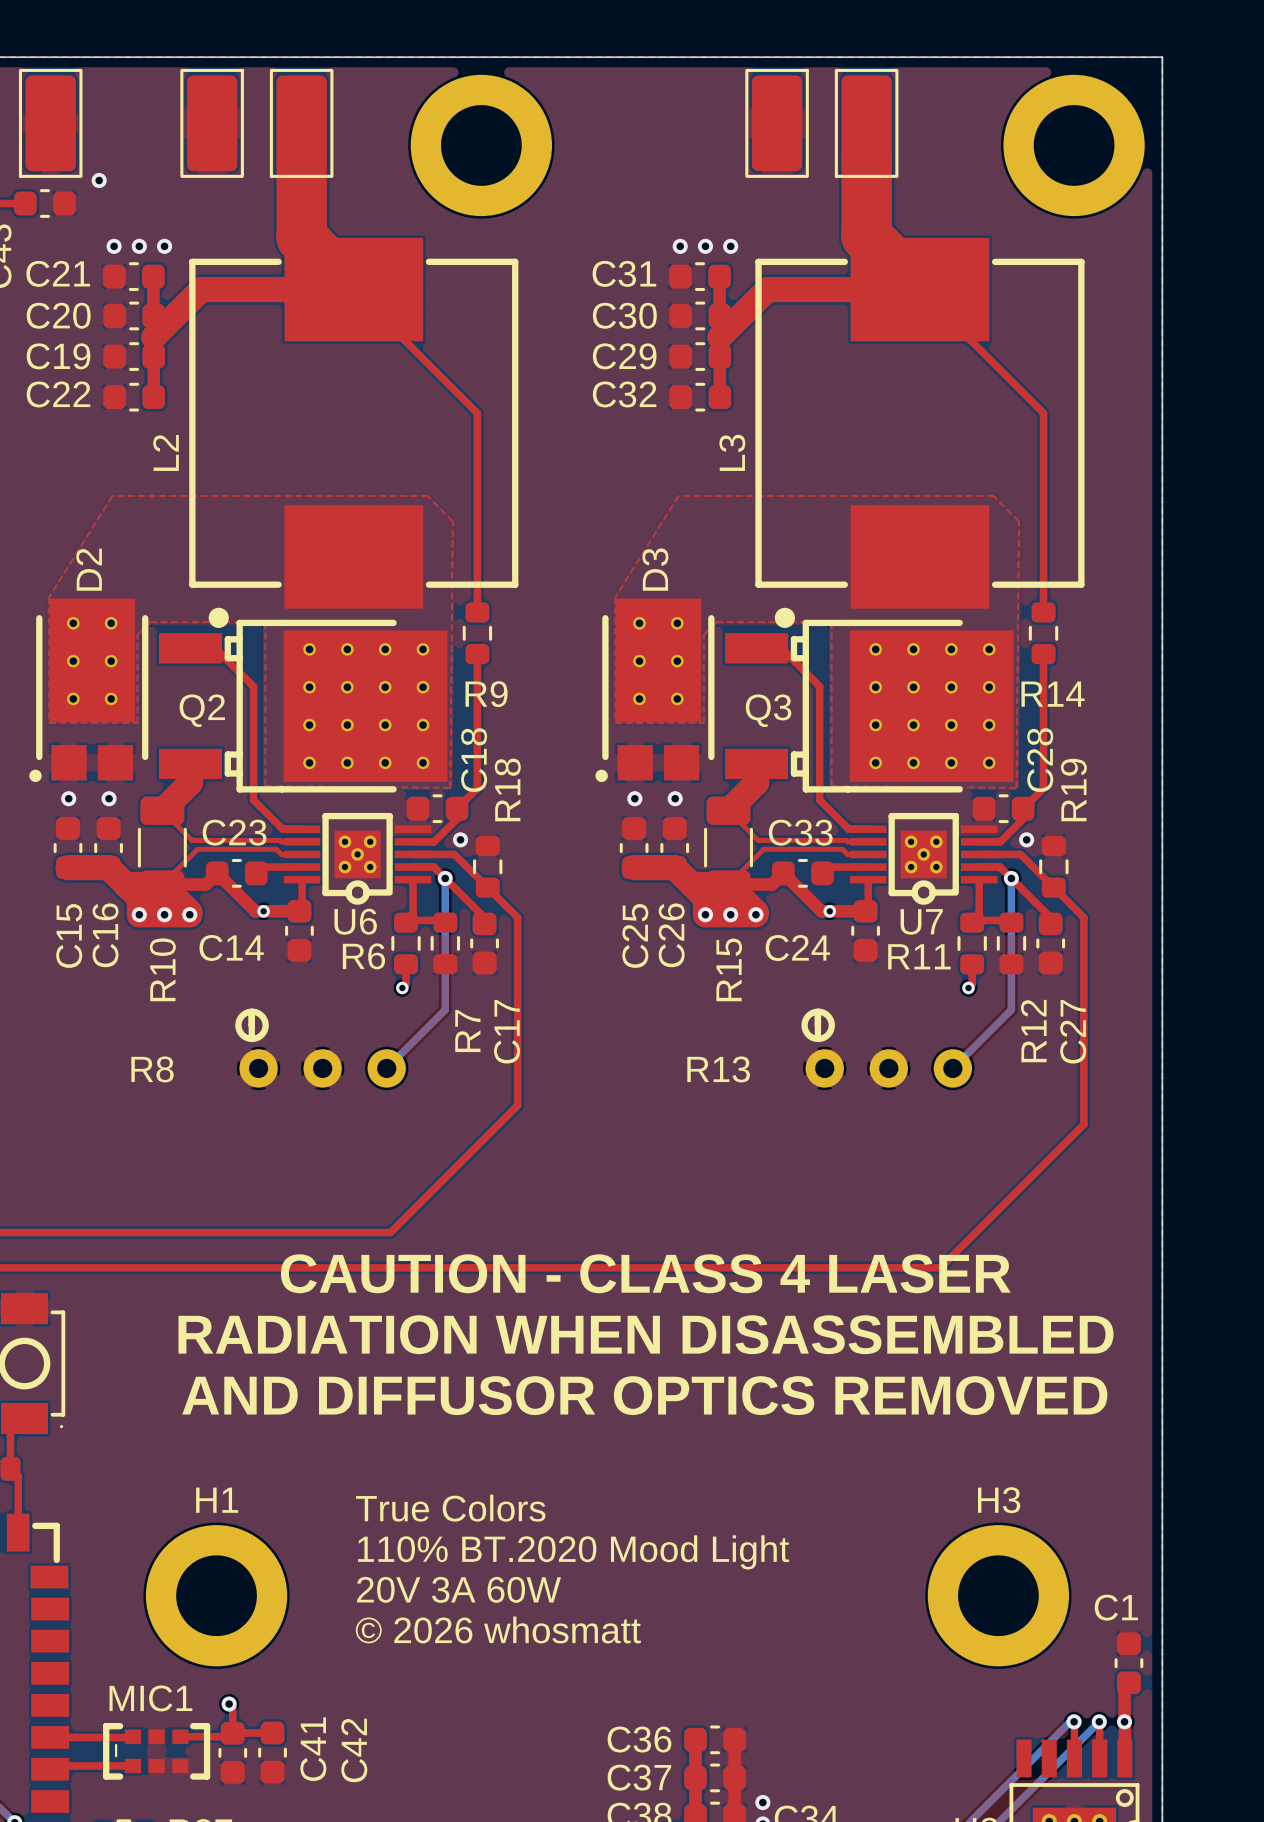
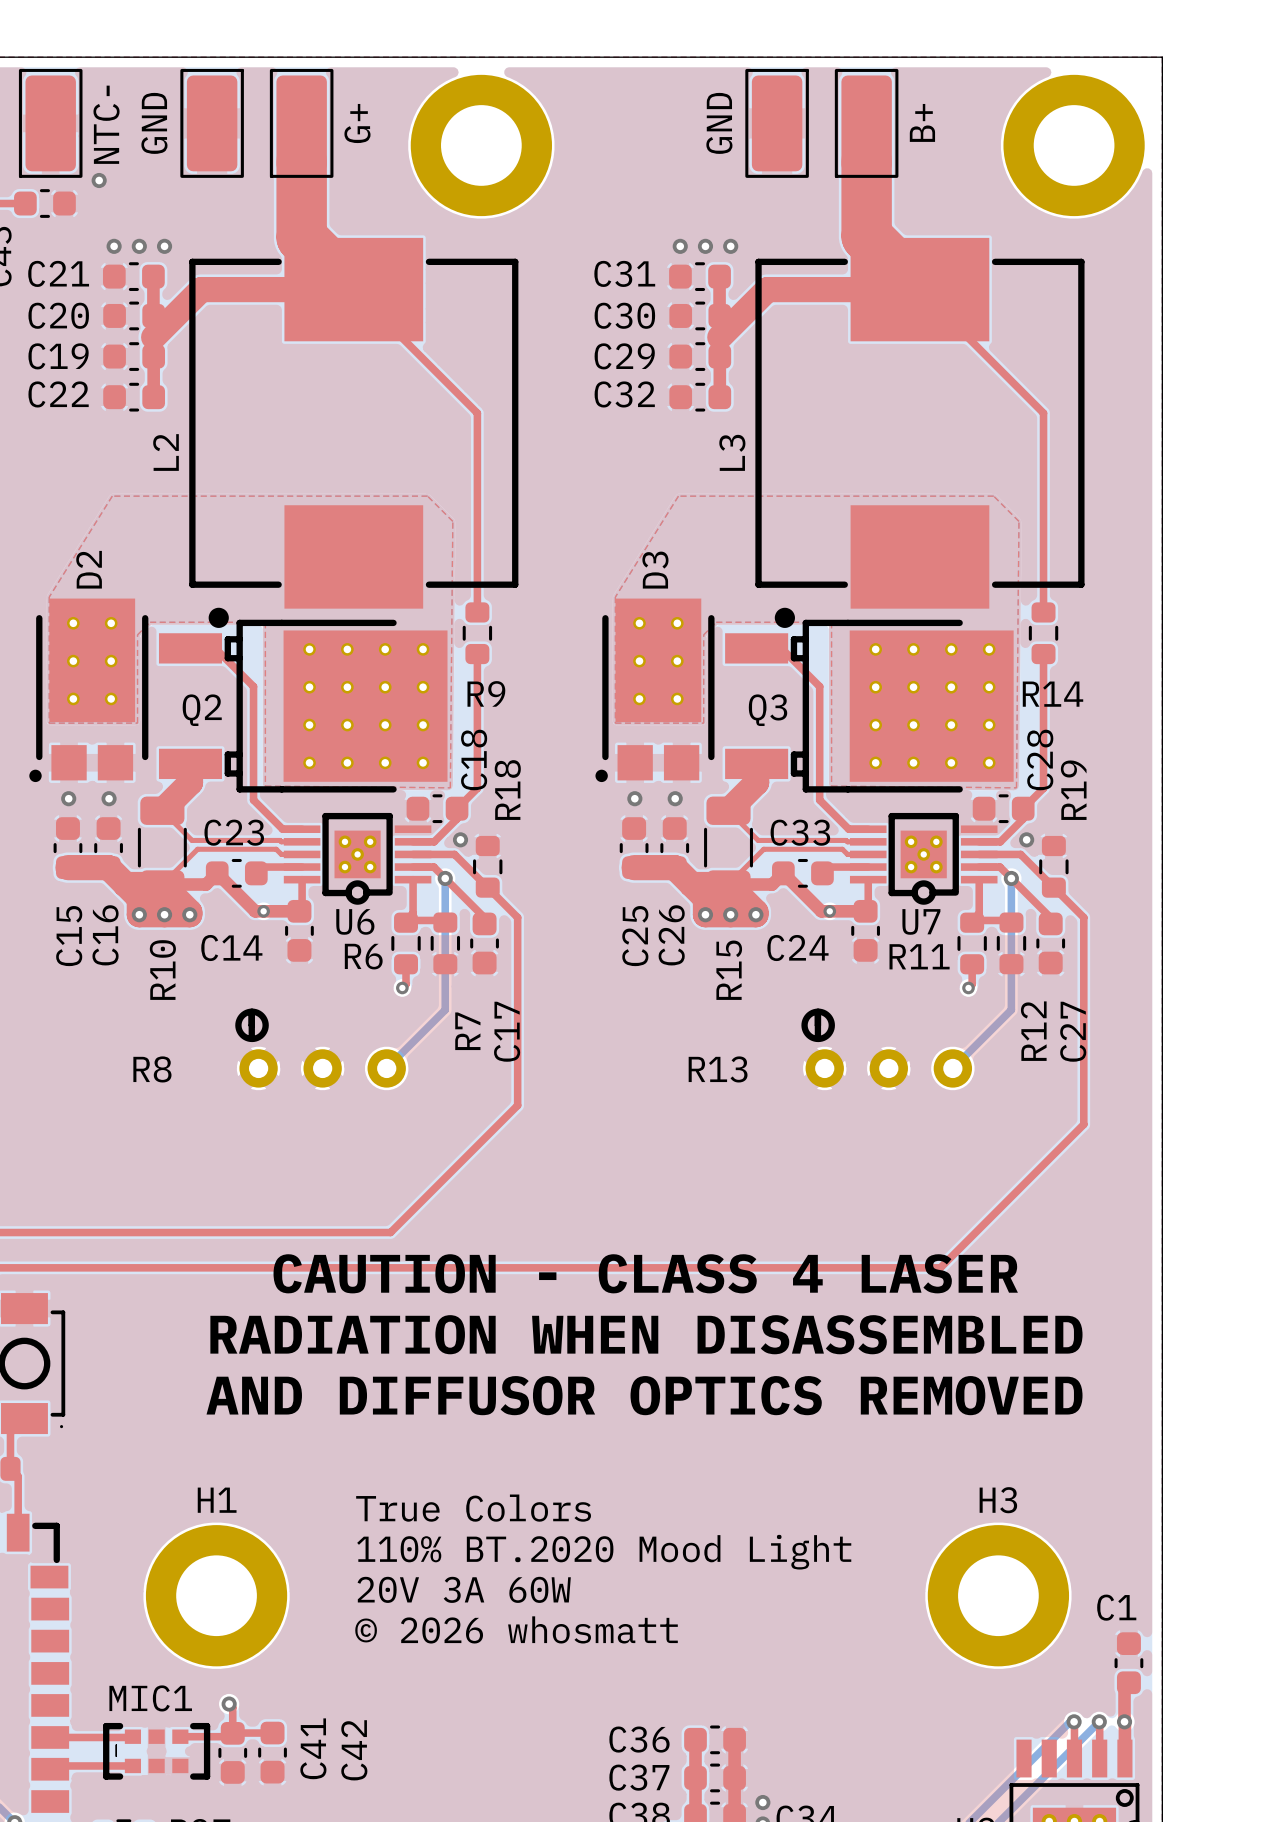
part value: none -> NTC- (106, 124)
part value: none -> B+ (922, 122)
part value: none -> GND (154, 123)
part value: none -> G+ (357, 123)
part value: none -> GND (719, 123)

